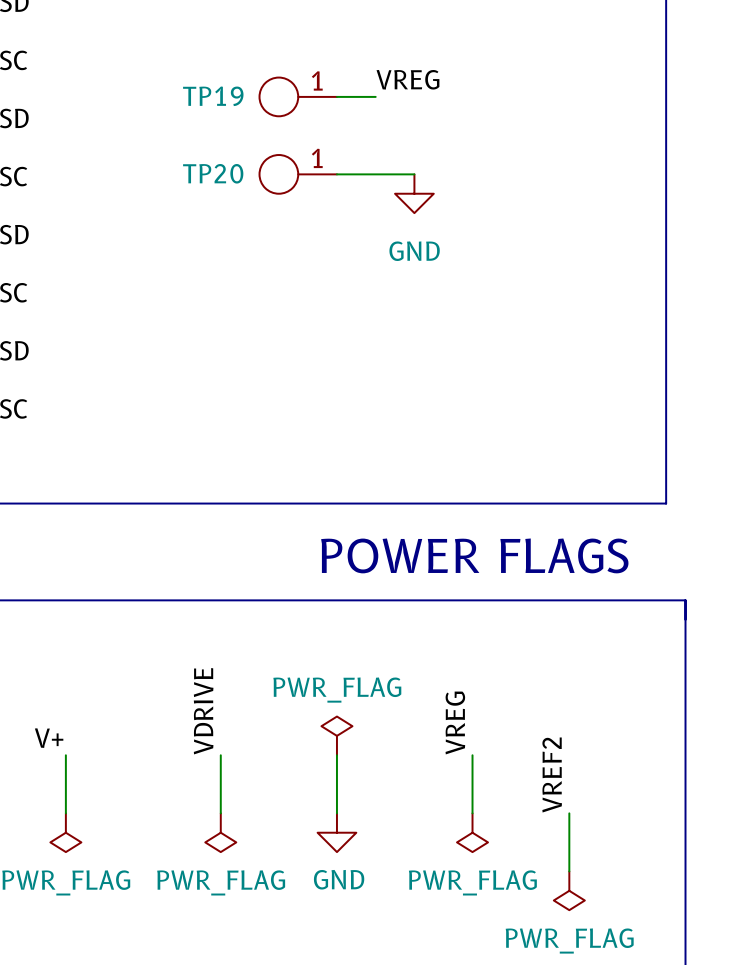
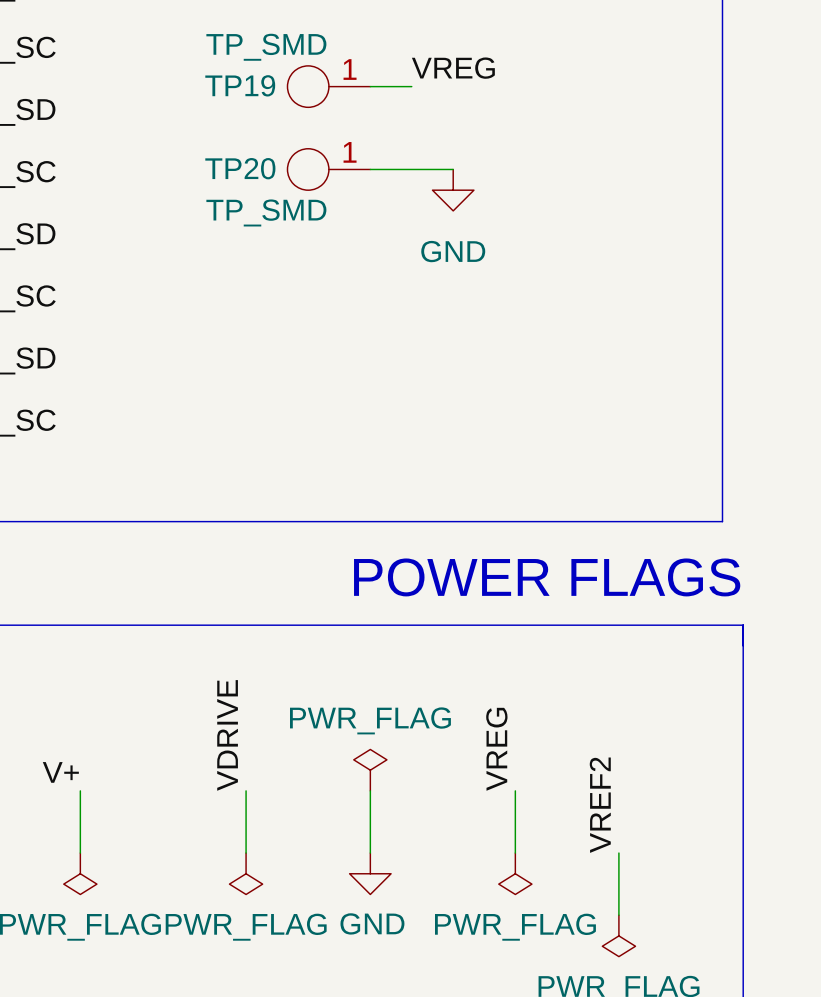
TP19 value: none -> TP_SMD (266, 47)
TP20 value: none -> TP_SMD (266, 212)

